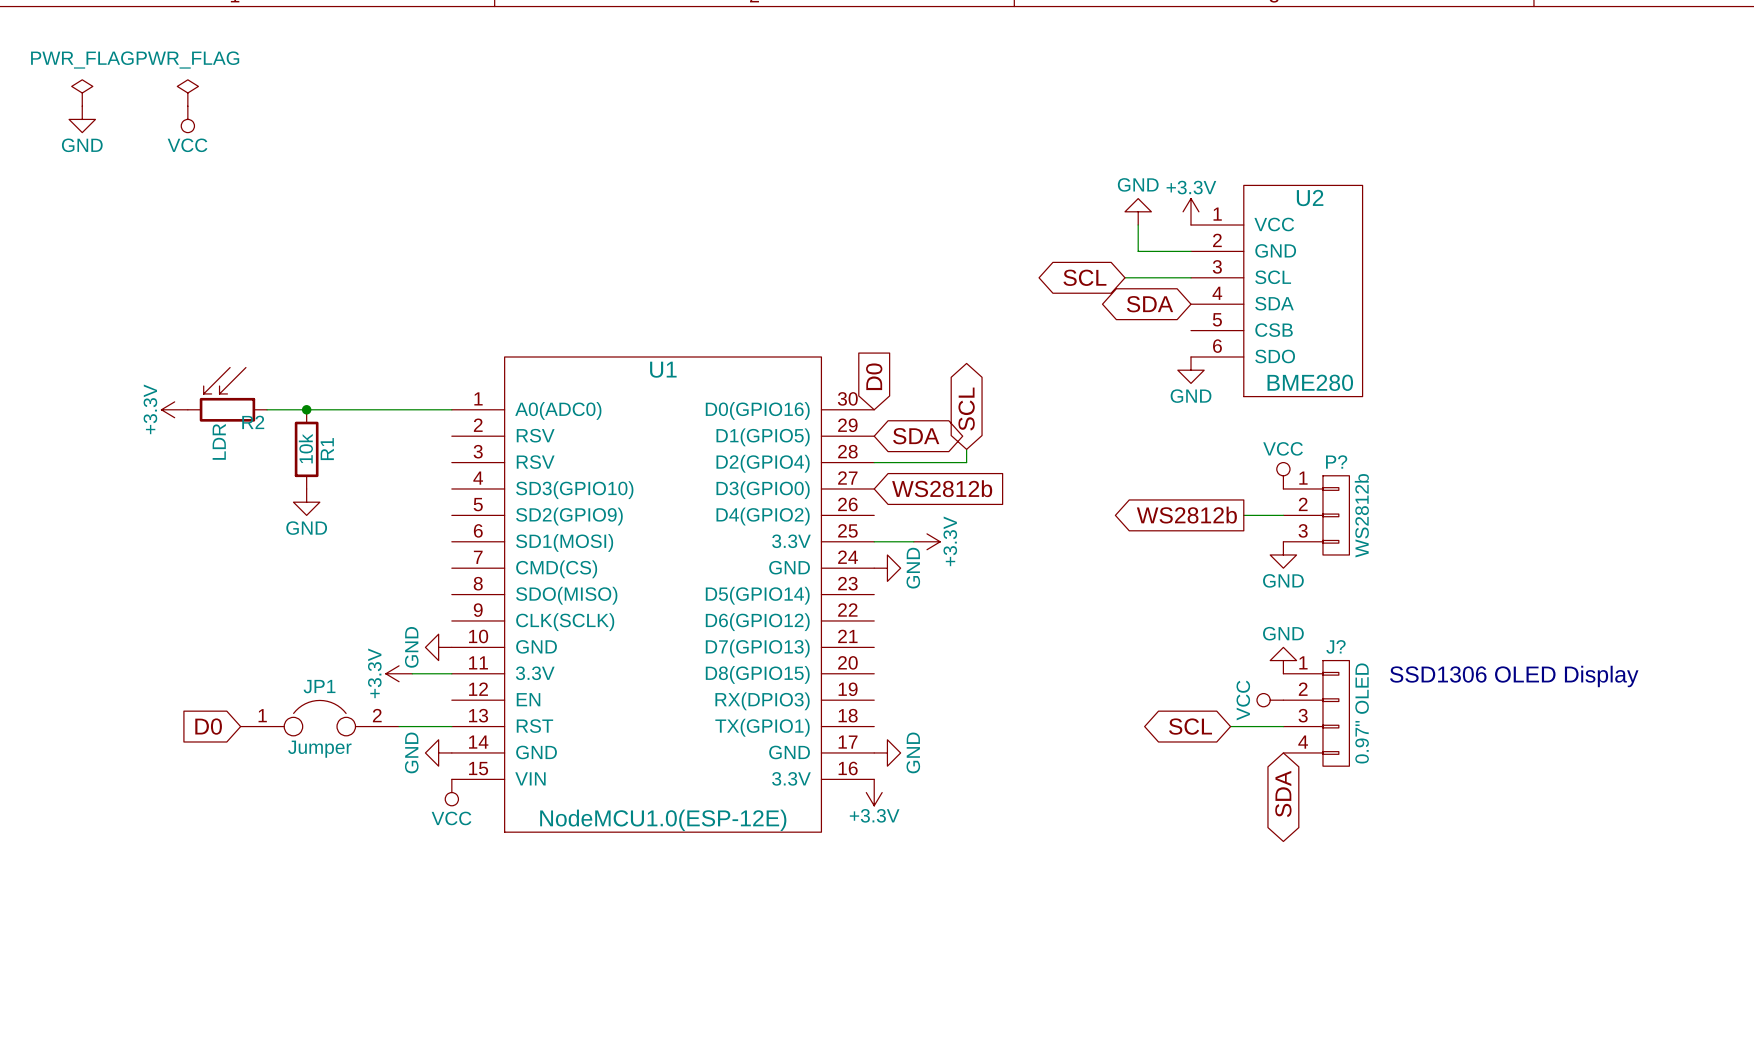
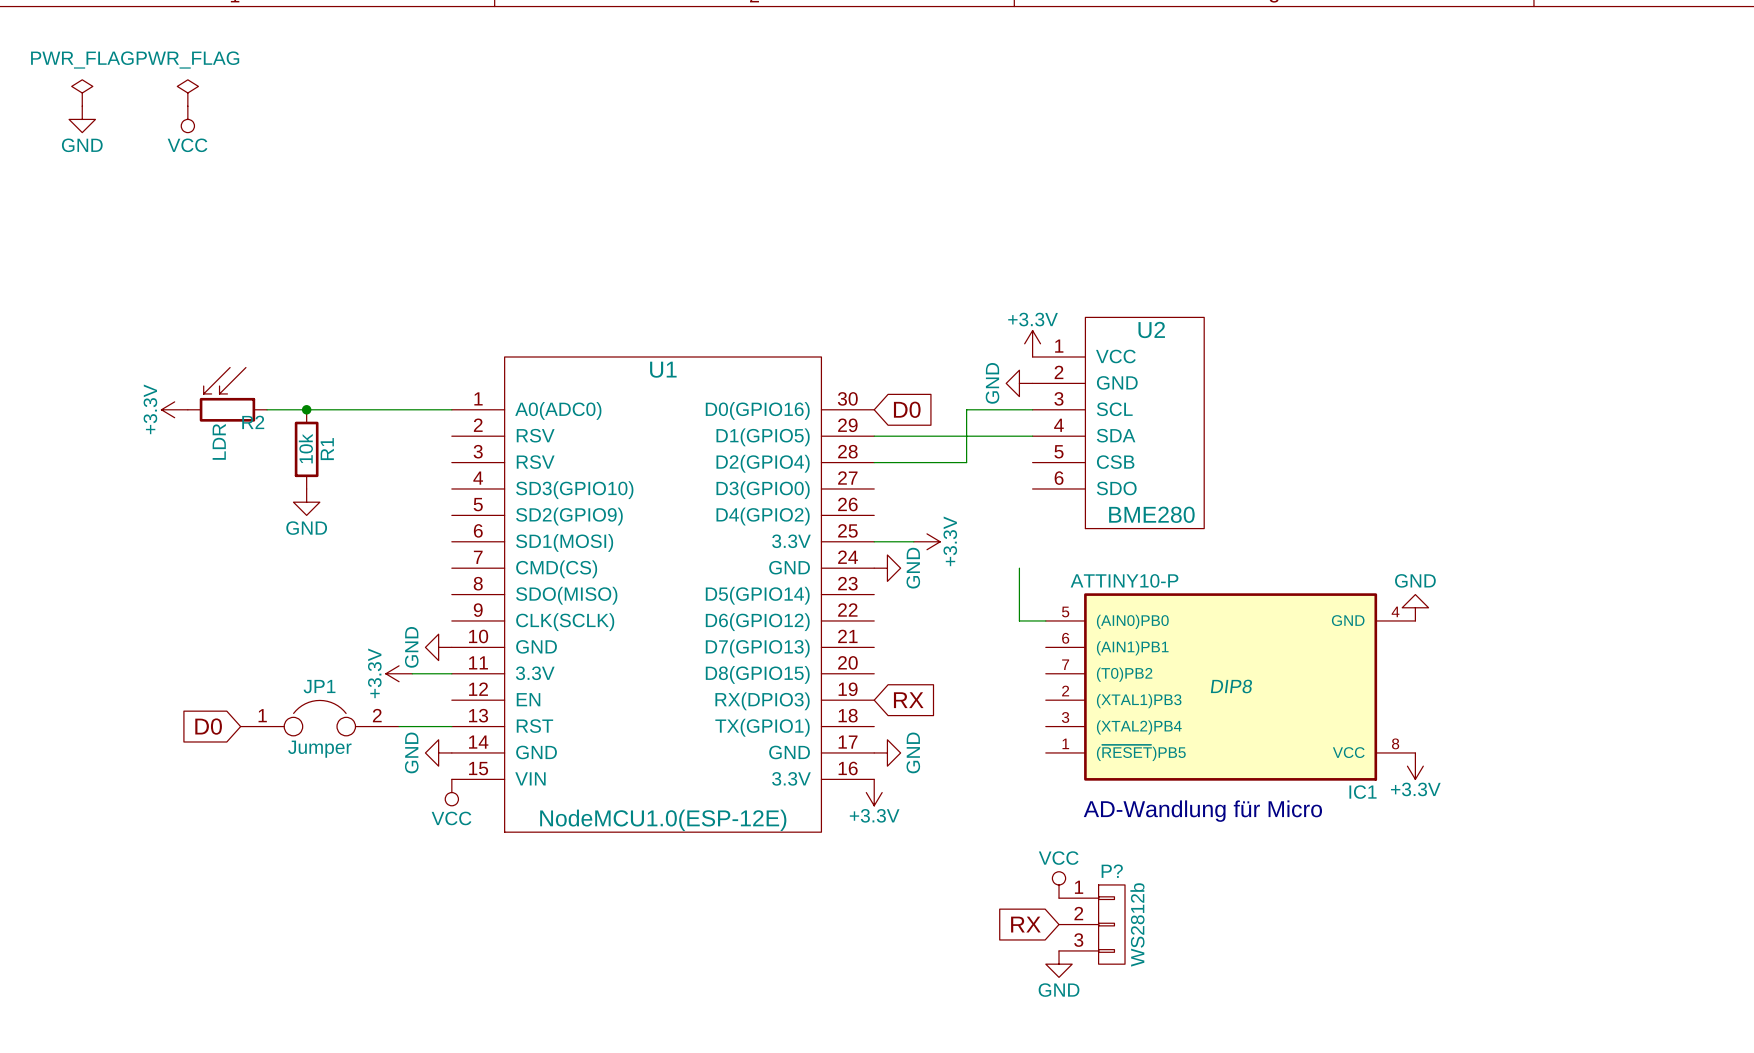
power symbol: GND (1138, 211) -> none
power symbol position: +3.3V (1191, 211) -> +3.3V (1032, 343)
wire: (1138, 225) (1138, 251) (1191, 251) -> none
global label: SCL (1084, 277) -> none
wire: (1125, 277) (1191, 277) -> none
U2 position: (1276, 291) -> (1118, 422)
global label: SDA (1150, 304) -> none
power symbol: GND (1191, 370) -> none
global label rotation: 0° (874, 376) -> 90° clockwise (907, 409)
power symbol: none -> GND (1019, 383)
global label: SCL (966, 409) -> none
wire: none -> (1032, 409) (966, 409) (966, 449)
wire: none -> (874, 436) (1032, 436)
global label: SDA (916, 436) -> none
power symbol: VCC (1283, 475) -> none
global label: WS2812b (942, 488) -> none
global label: WS2812b (1186, 515) -> none
wire: (1243, 515) (1283, 515) -> none
P?: WS2812b (1316, 515) -> none
power symbol: GND (1283, 554) -> none
wire: none -> (1019, 568) (1019, 620) (1045, 620)
power symbol: none -> GND (1415, 607)
power symbol: GND (1283, 660) -> none
text: SSD1306 OLED Display (1514, 676) -> none
IC1: none -> ATTINY10-P (1230, 686)
global label: none -> RX (908, 700)
power symbol: VCC (1270, 700) -> none
J?: 0.97" OLED (1316, 713) -> none
global label: SCL (1190, 726) -> none
power symbol: none -> +3.3V (1415, 766)
global label: SDA (1283, 793) -> none
text: none -> AD-Wandlung für Micro (1202, 811)
power symbol: none -> VCC (1059, 884)
global label: none -> RX (1025, 924)
P?: none -> WS2812b (1092, 924)
power symbol: none -> GND (1059, 964)

